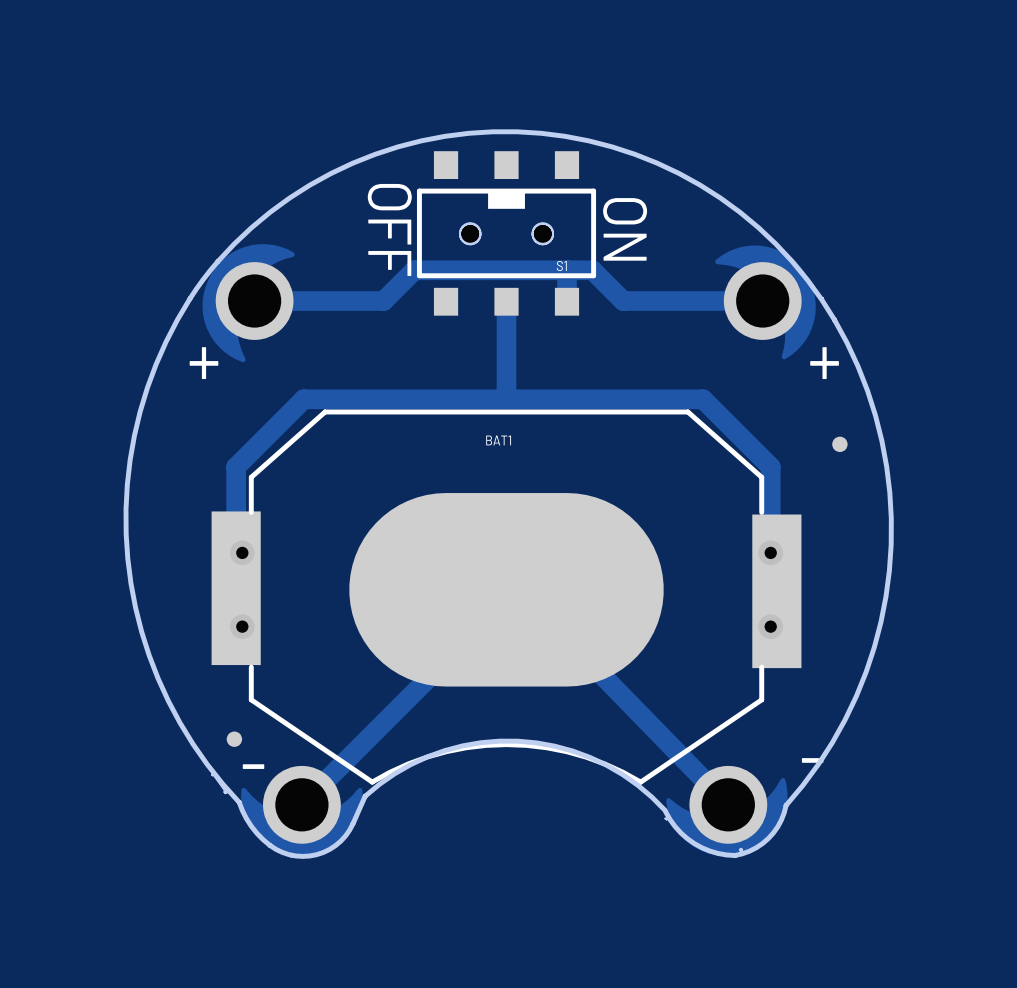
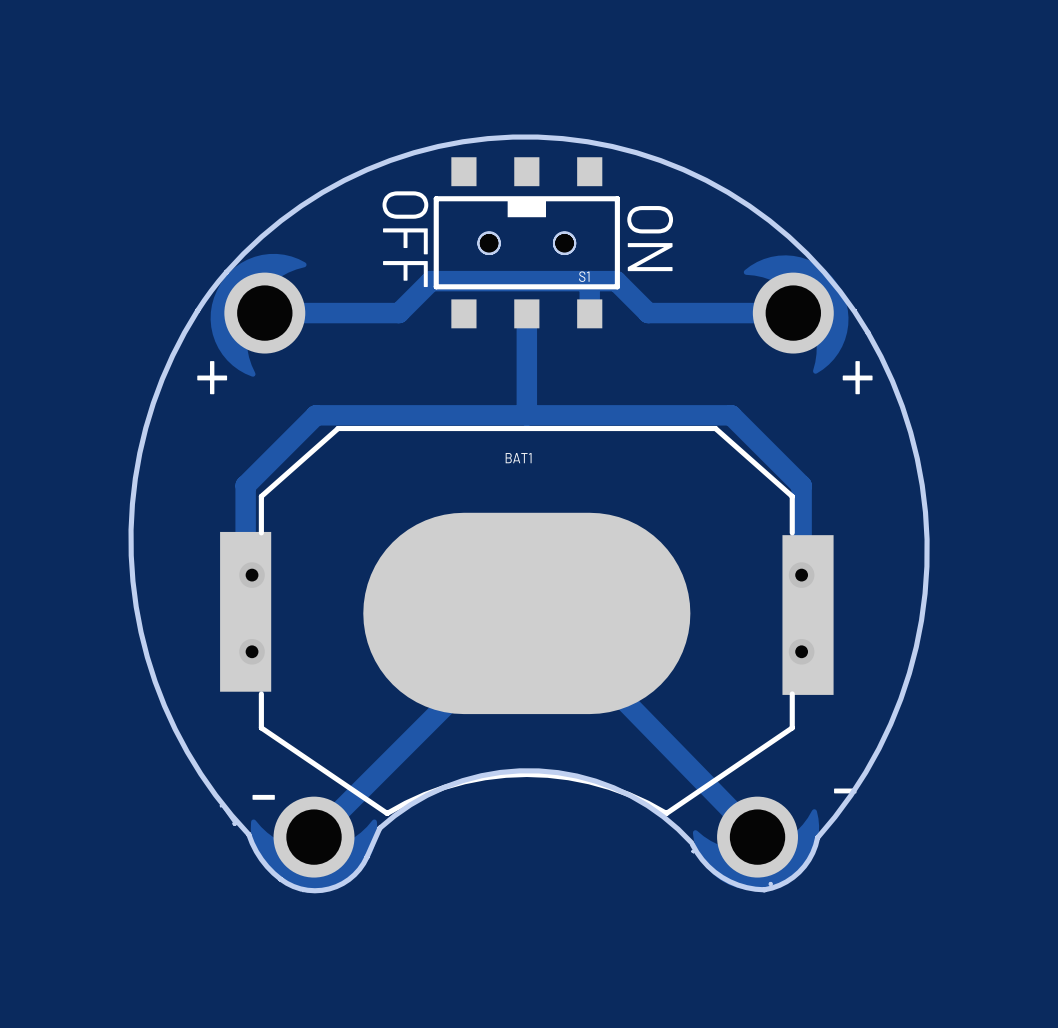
part: (839, 444) -> none
part: (234, 739) -> none

